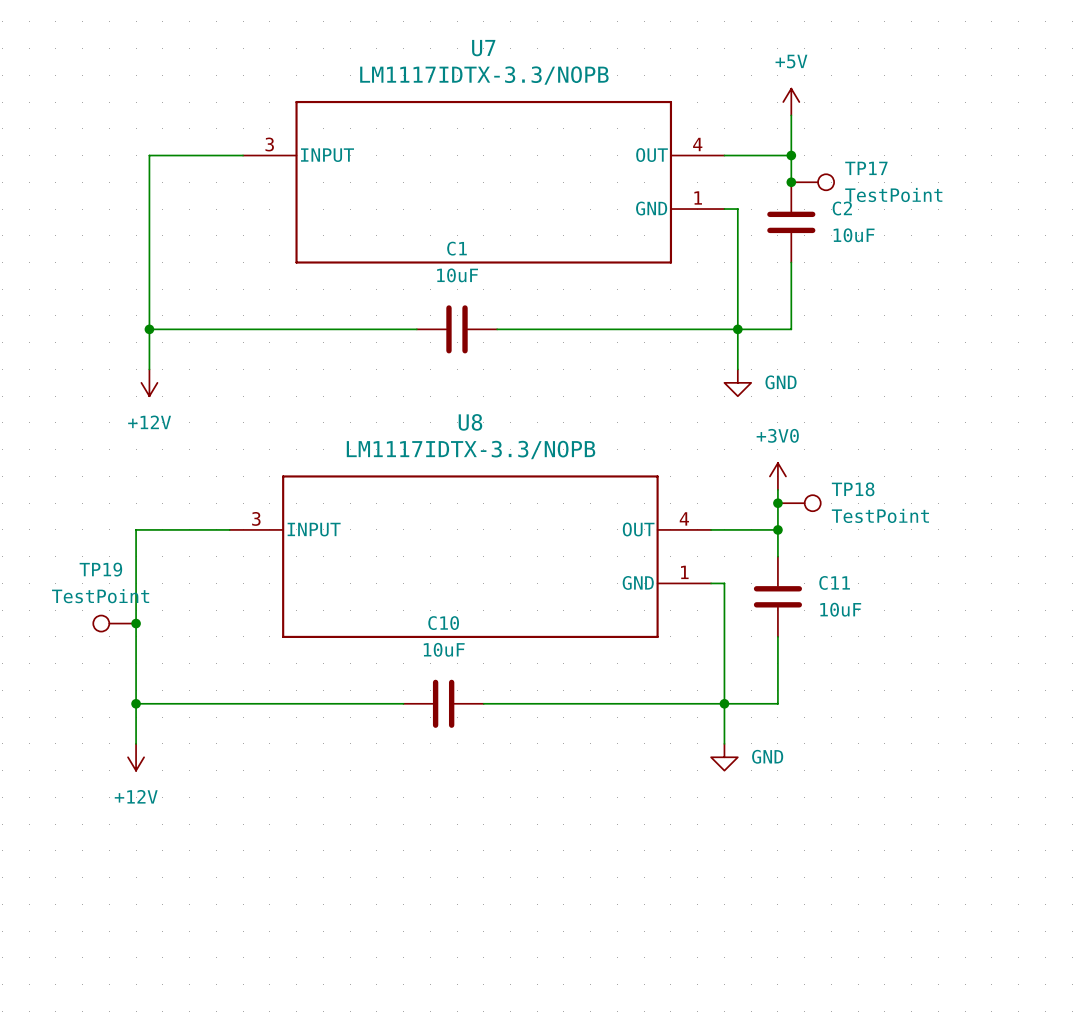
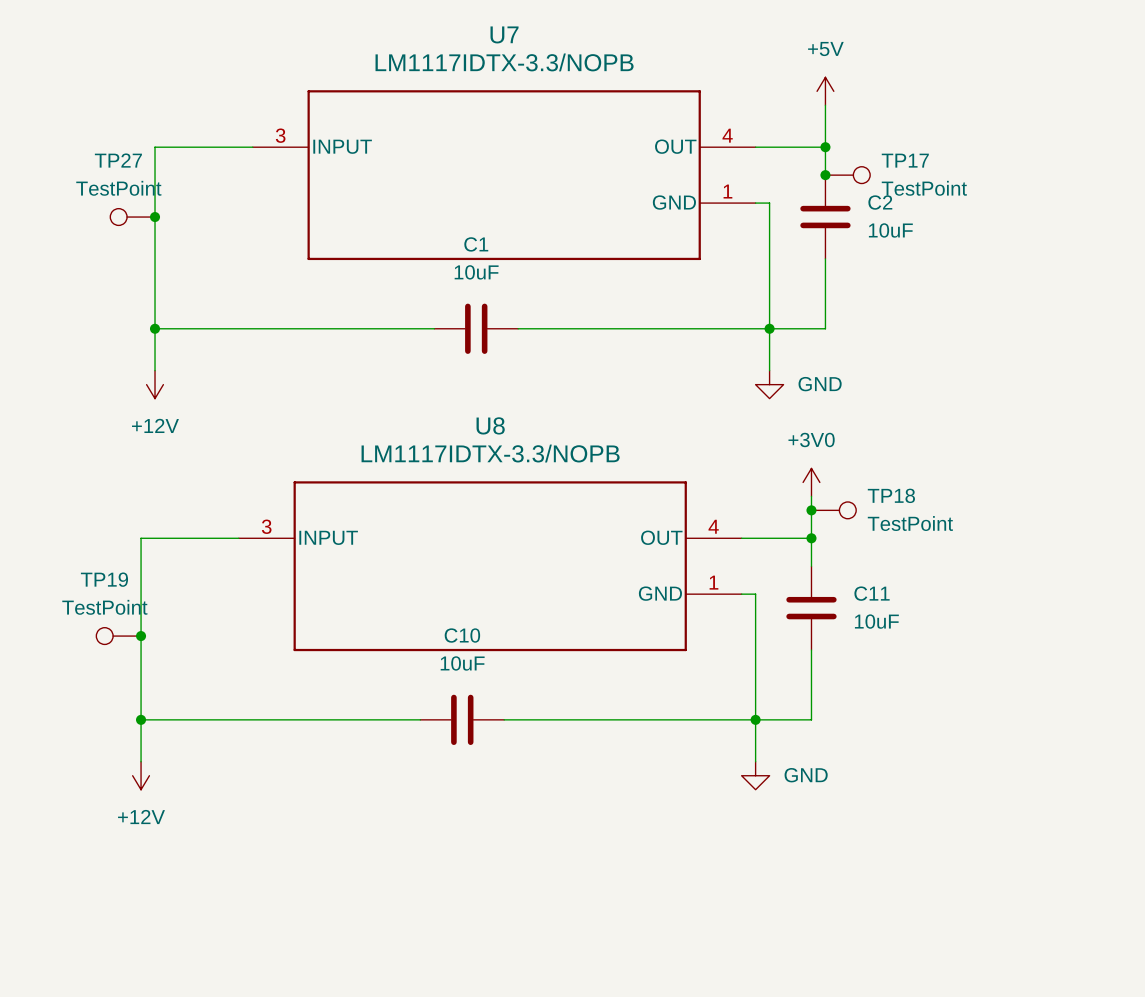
TP27: none -> TestPoint (132, 217)
junction: none -> (155, 217)

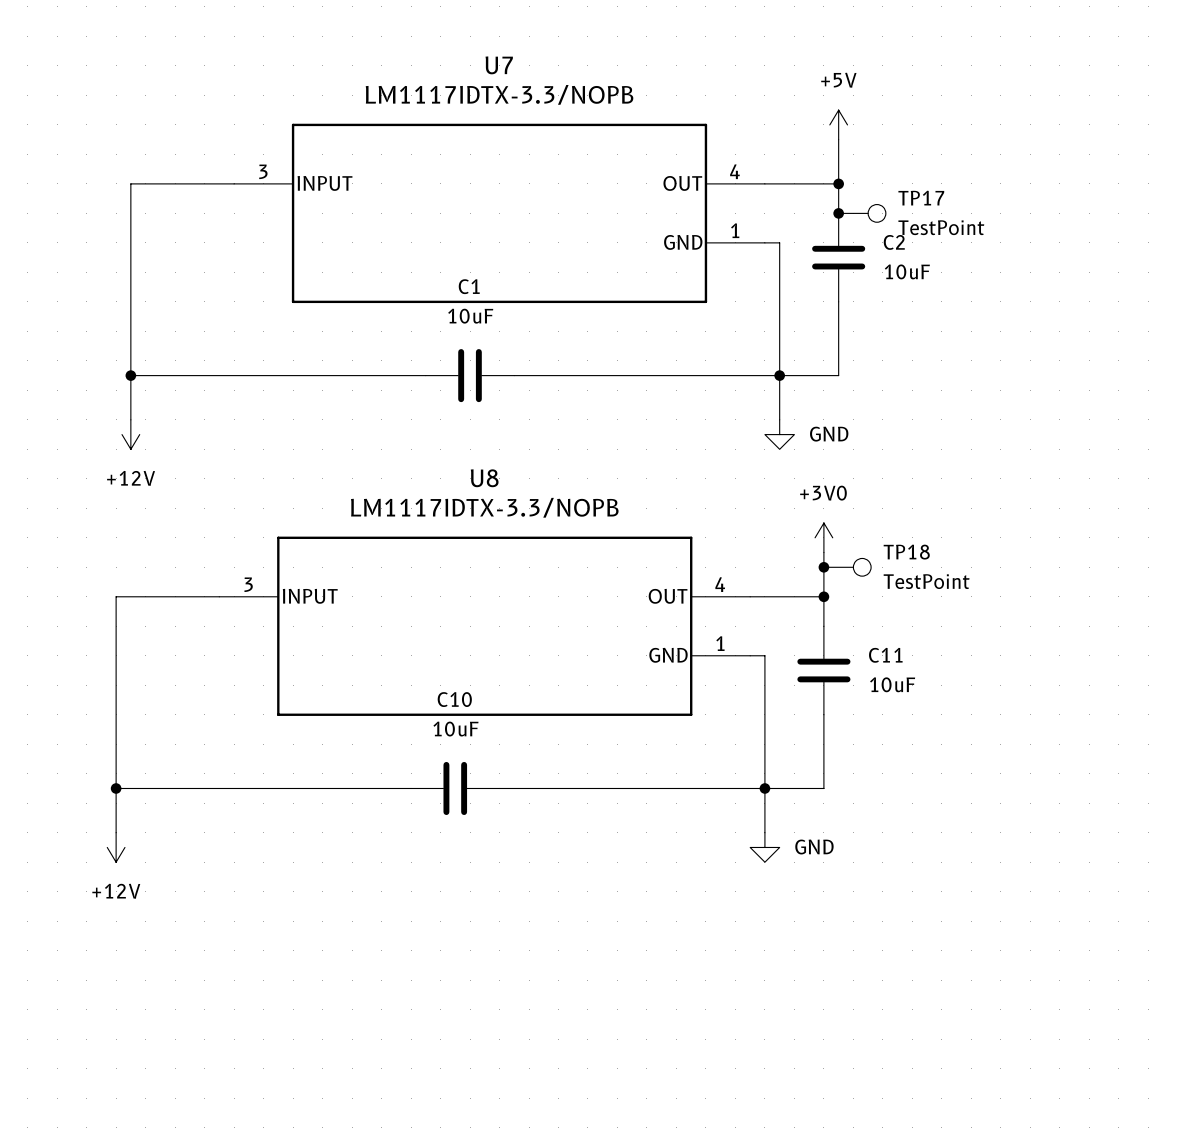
TP27: TestPoint (132, 217) -> none
junction: (155, 217) -> none
TP19: TestPoint (118, 636) -> none
junction: (141, 636) -> none

